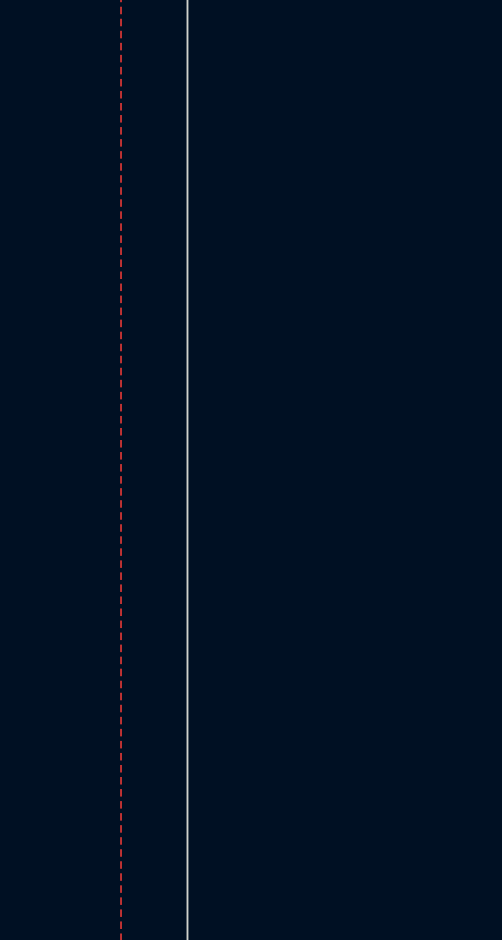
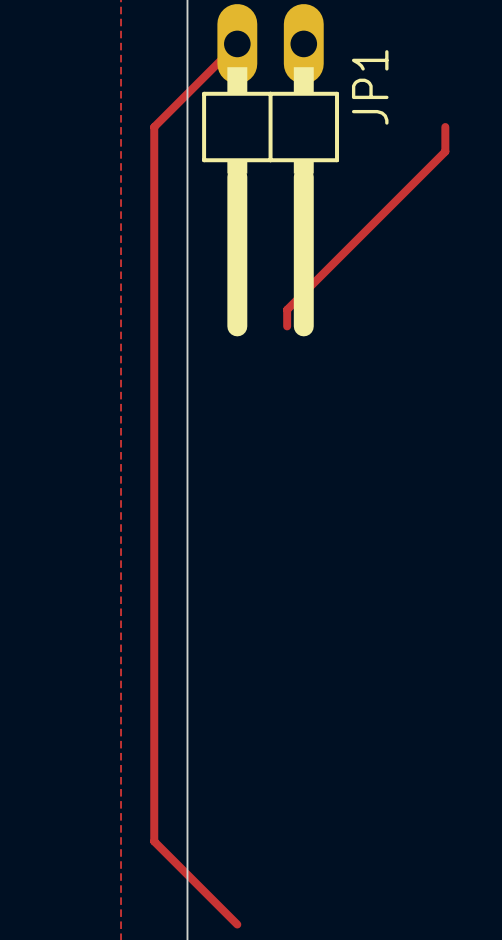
track: none -> (237, 43) (154, 127) (154, 841) (237, 924)
track: none -> (445, 127) (445, 151) (287, 309) (287, 326)
JP1: none -> (270, 170)

